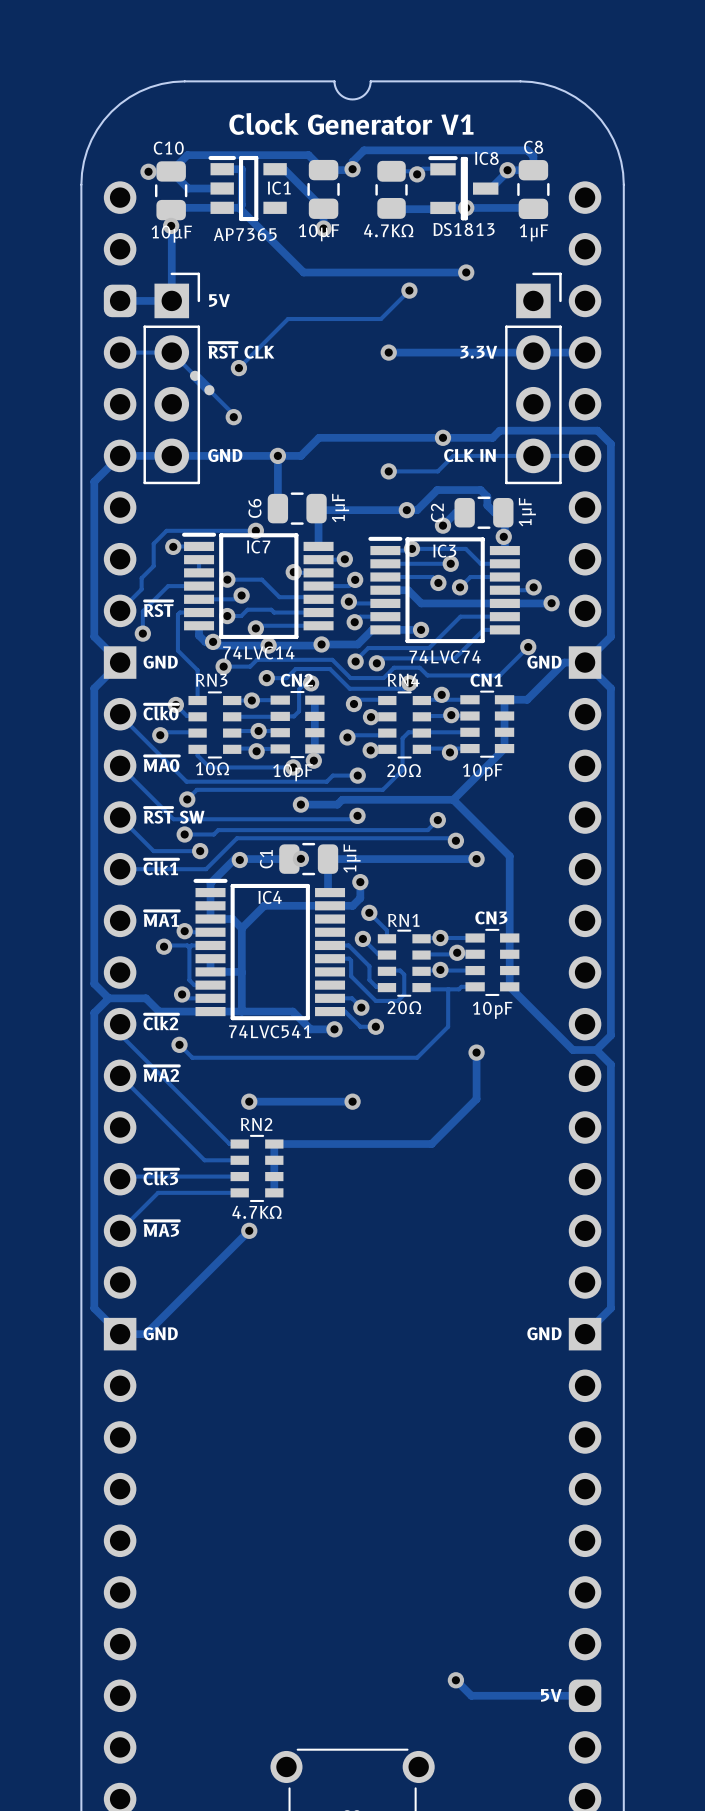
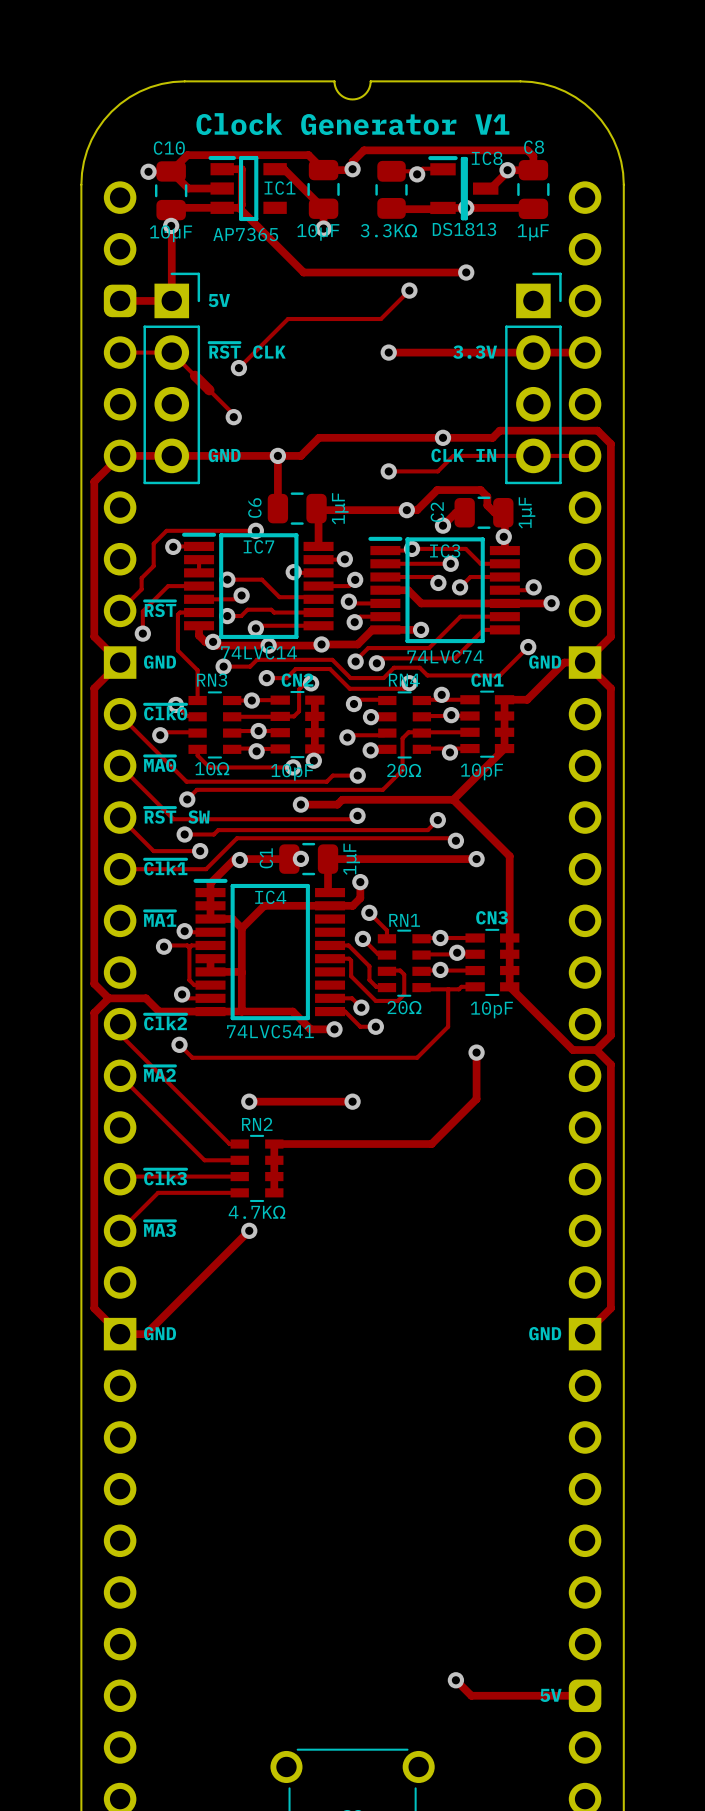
part value: 4.7KΩ (388, 230) -> 3.3KΩ (388, 230)

